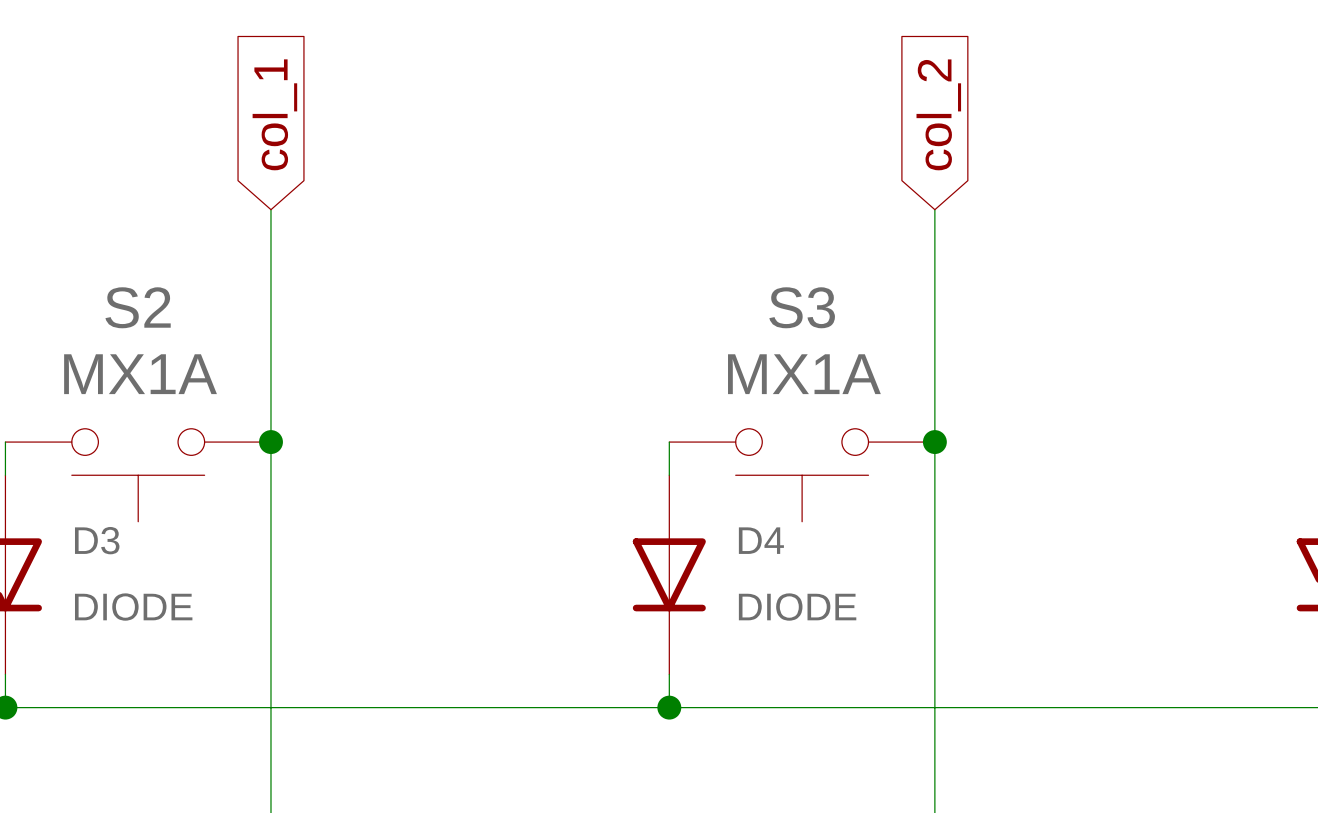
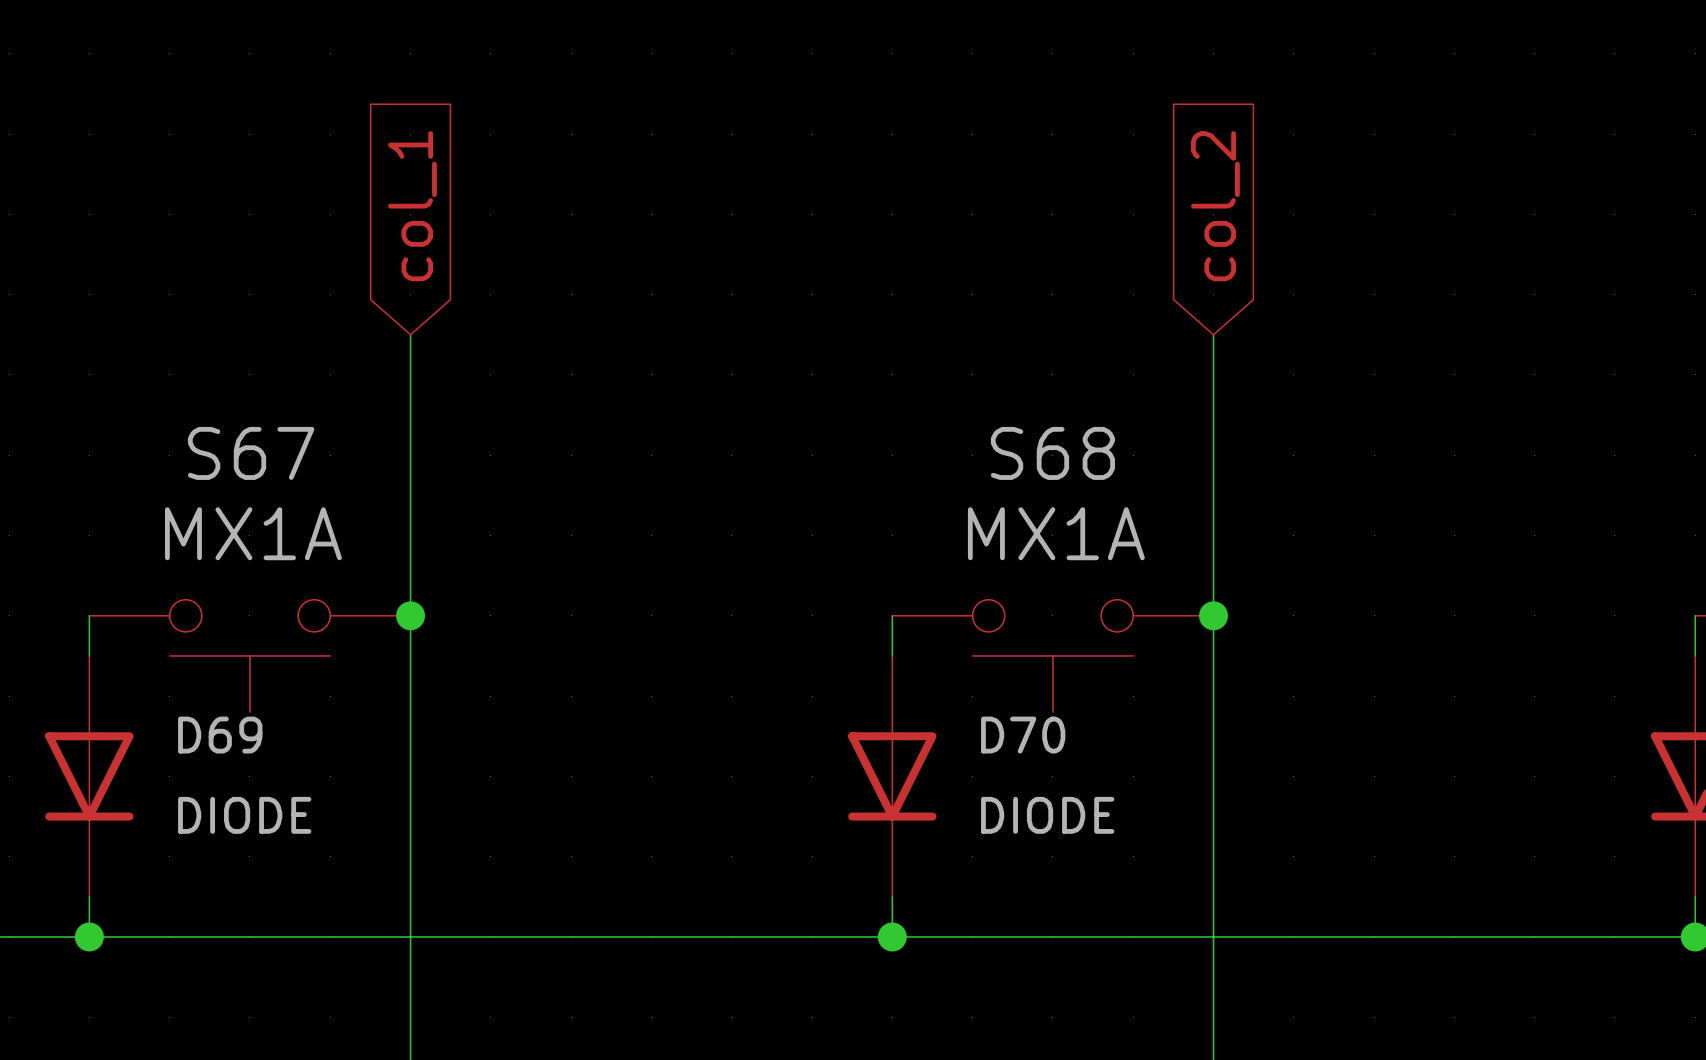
S2 name: S2 (138, 307) -> S67 (251, 453)
S3 name: S3 (802, 307) -> S68 (1052, 453)
D3 name: D3 (97, 540) -> D69 (220, 735)
D4 name: D4 (761, 540) -> D70 (1023, 735)

